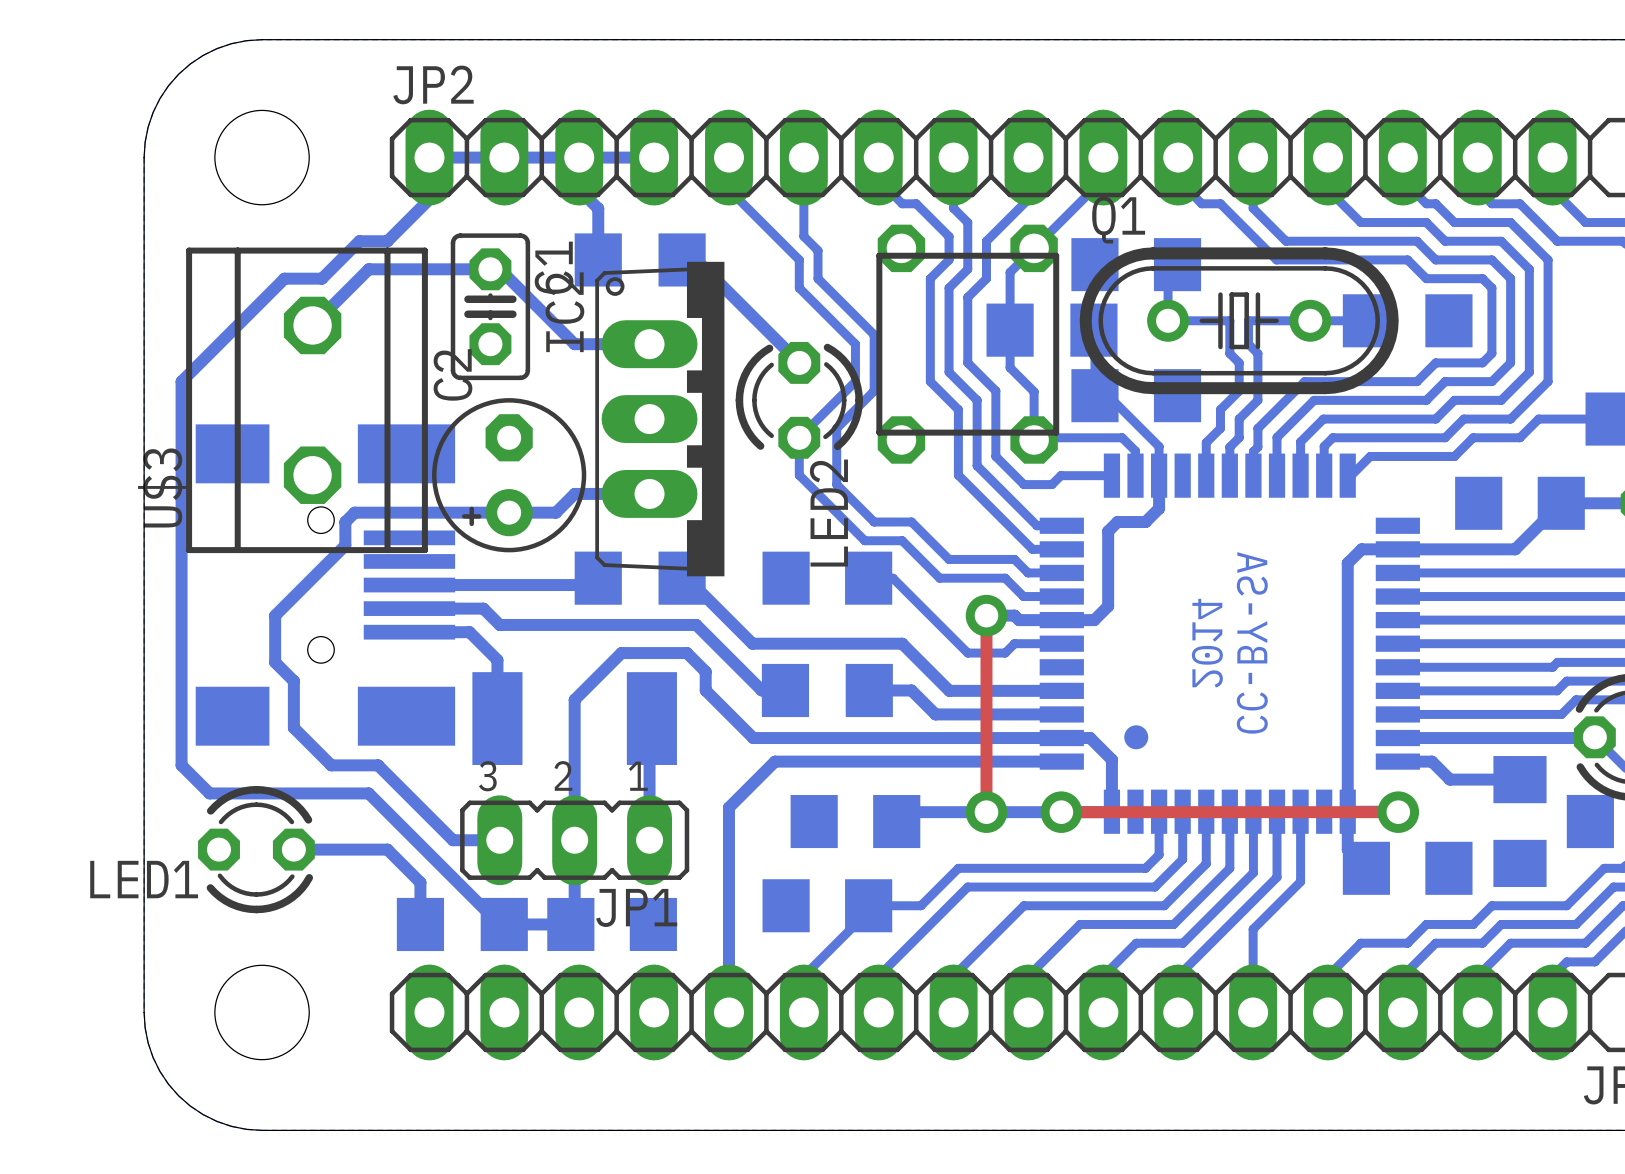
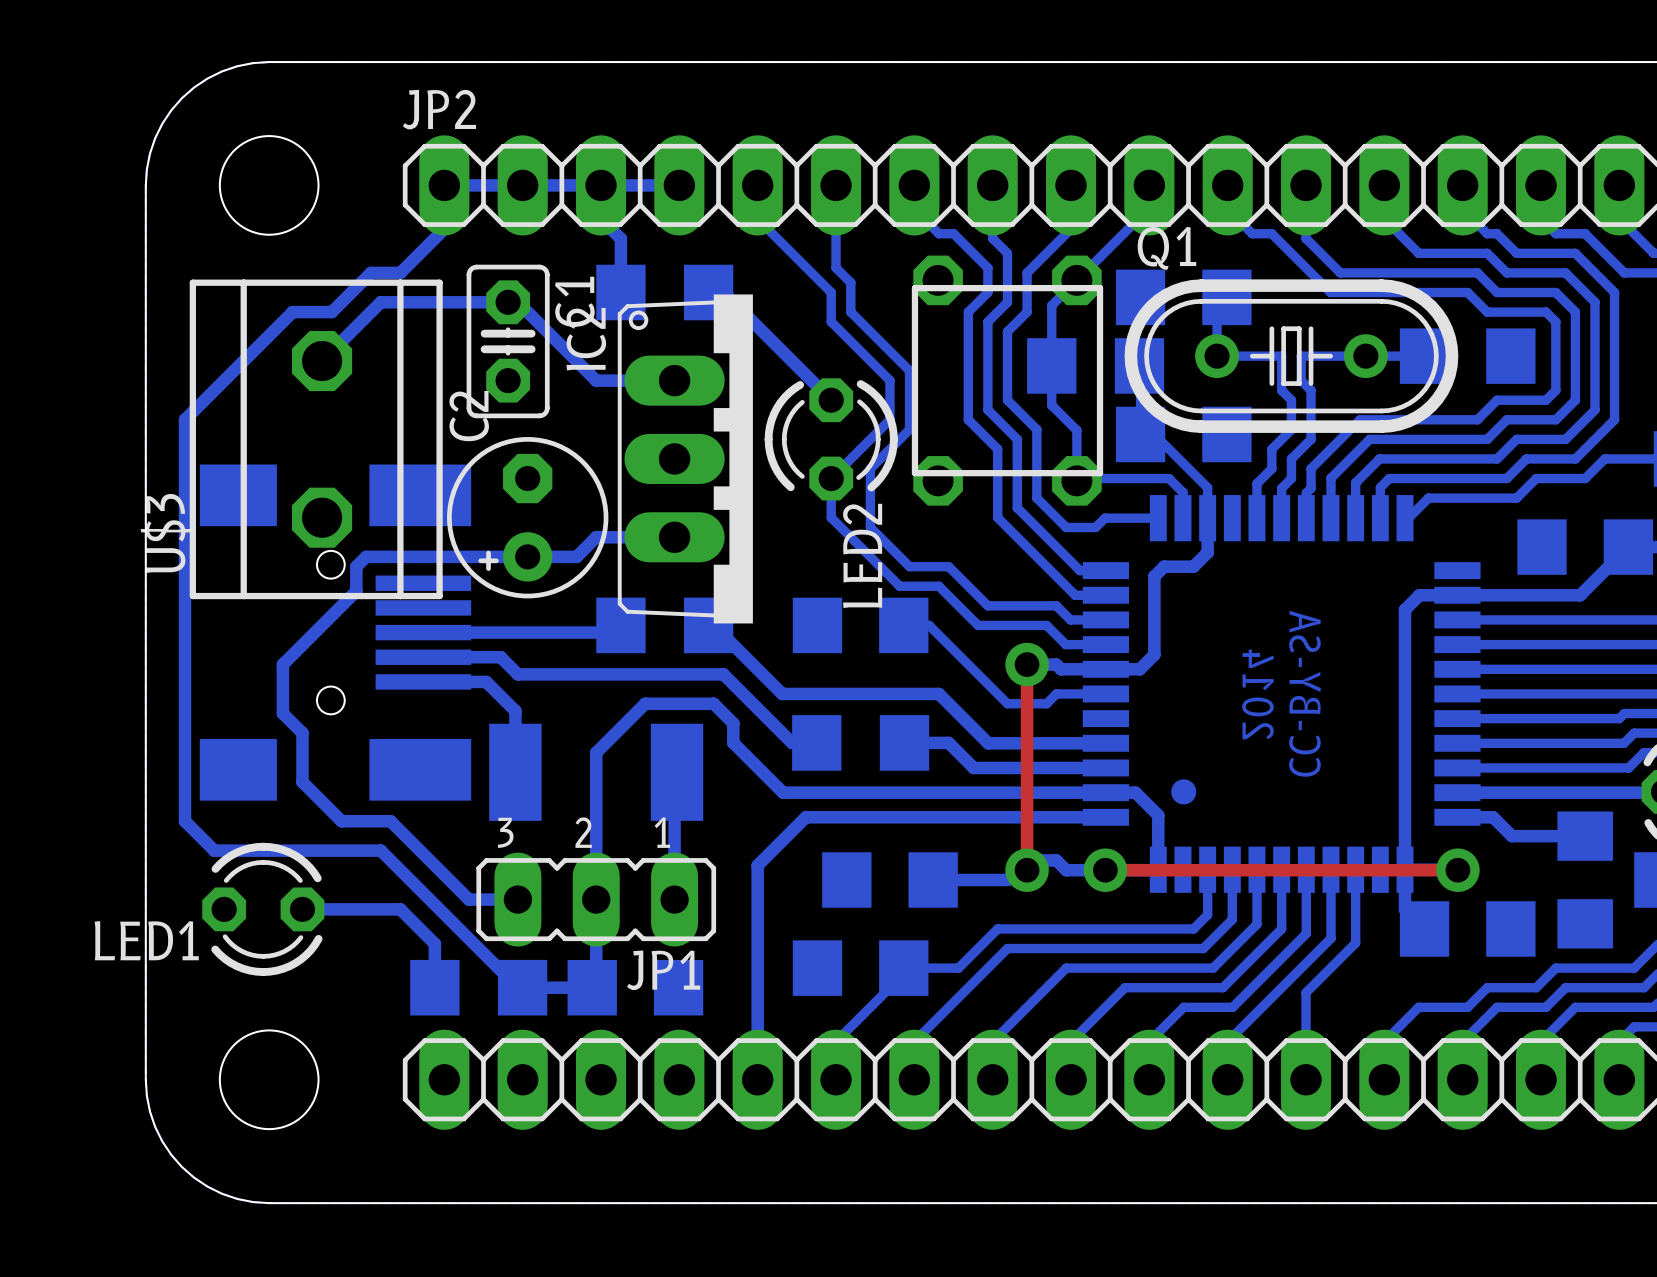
bottom track: (906, 812) (1023, 812) -> (933, 880) (1007, 880) (1027, 860) (1056, 860) (1066, 870)

